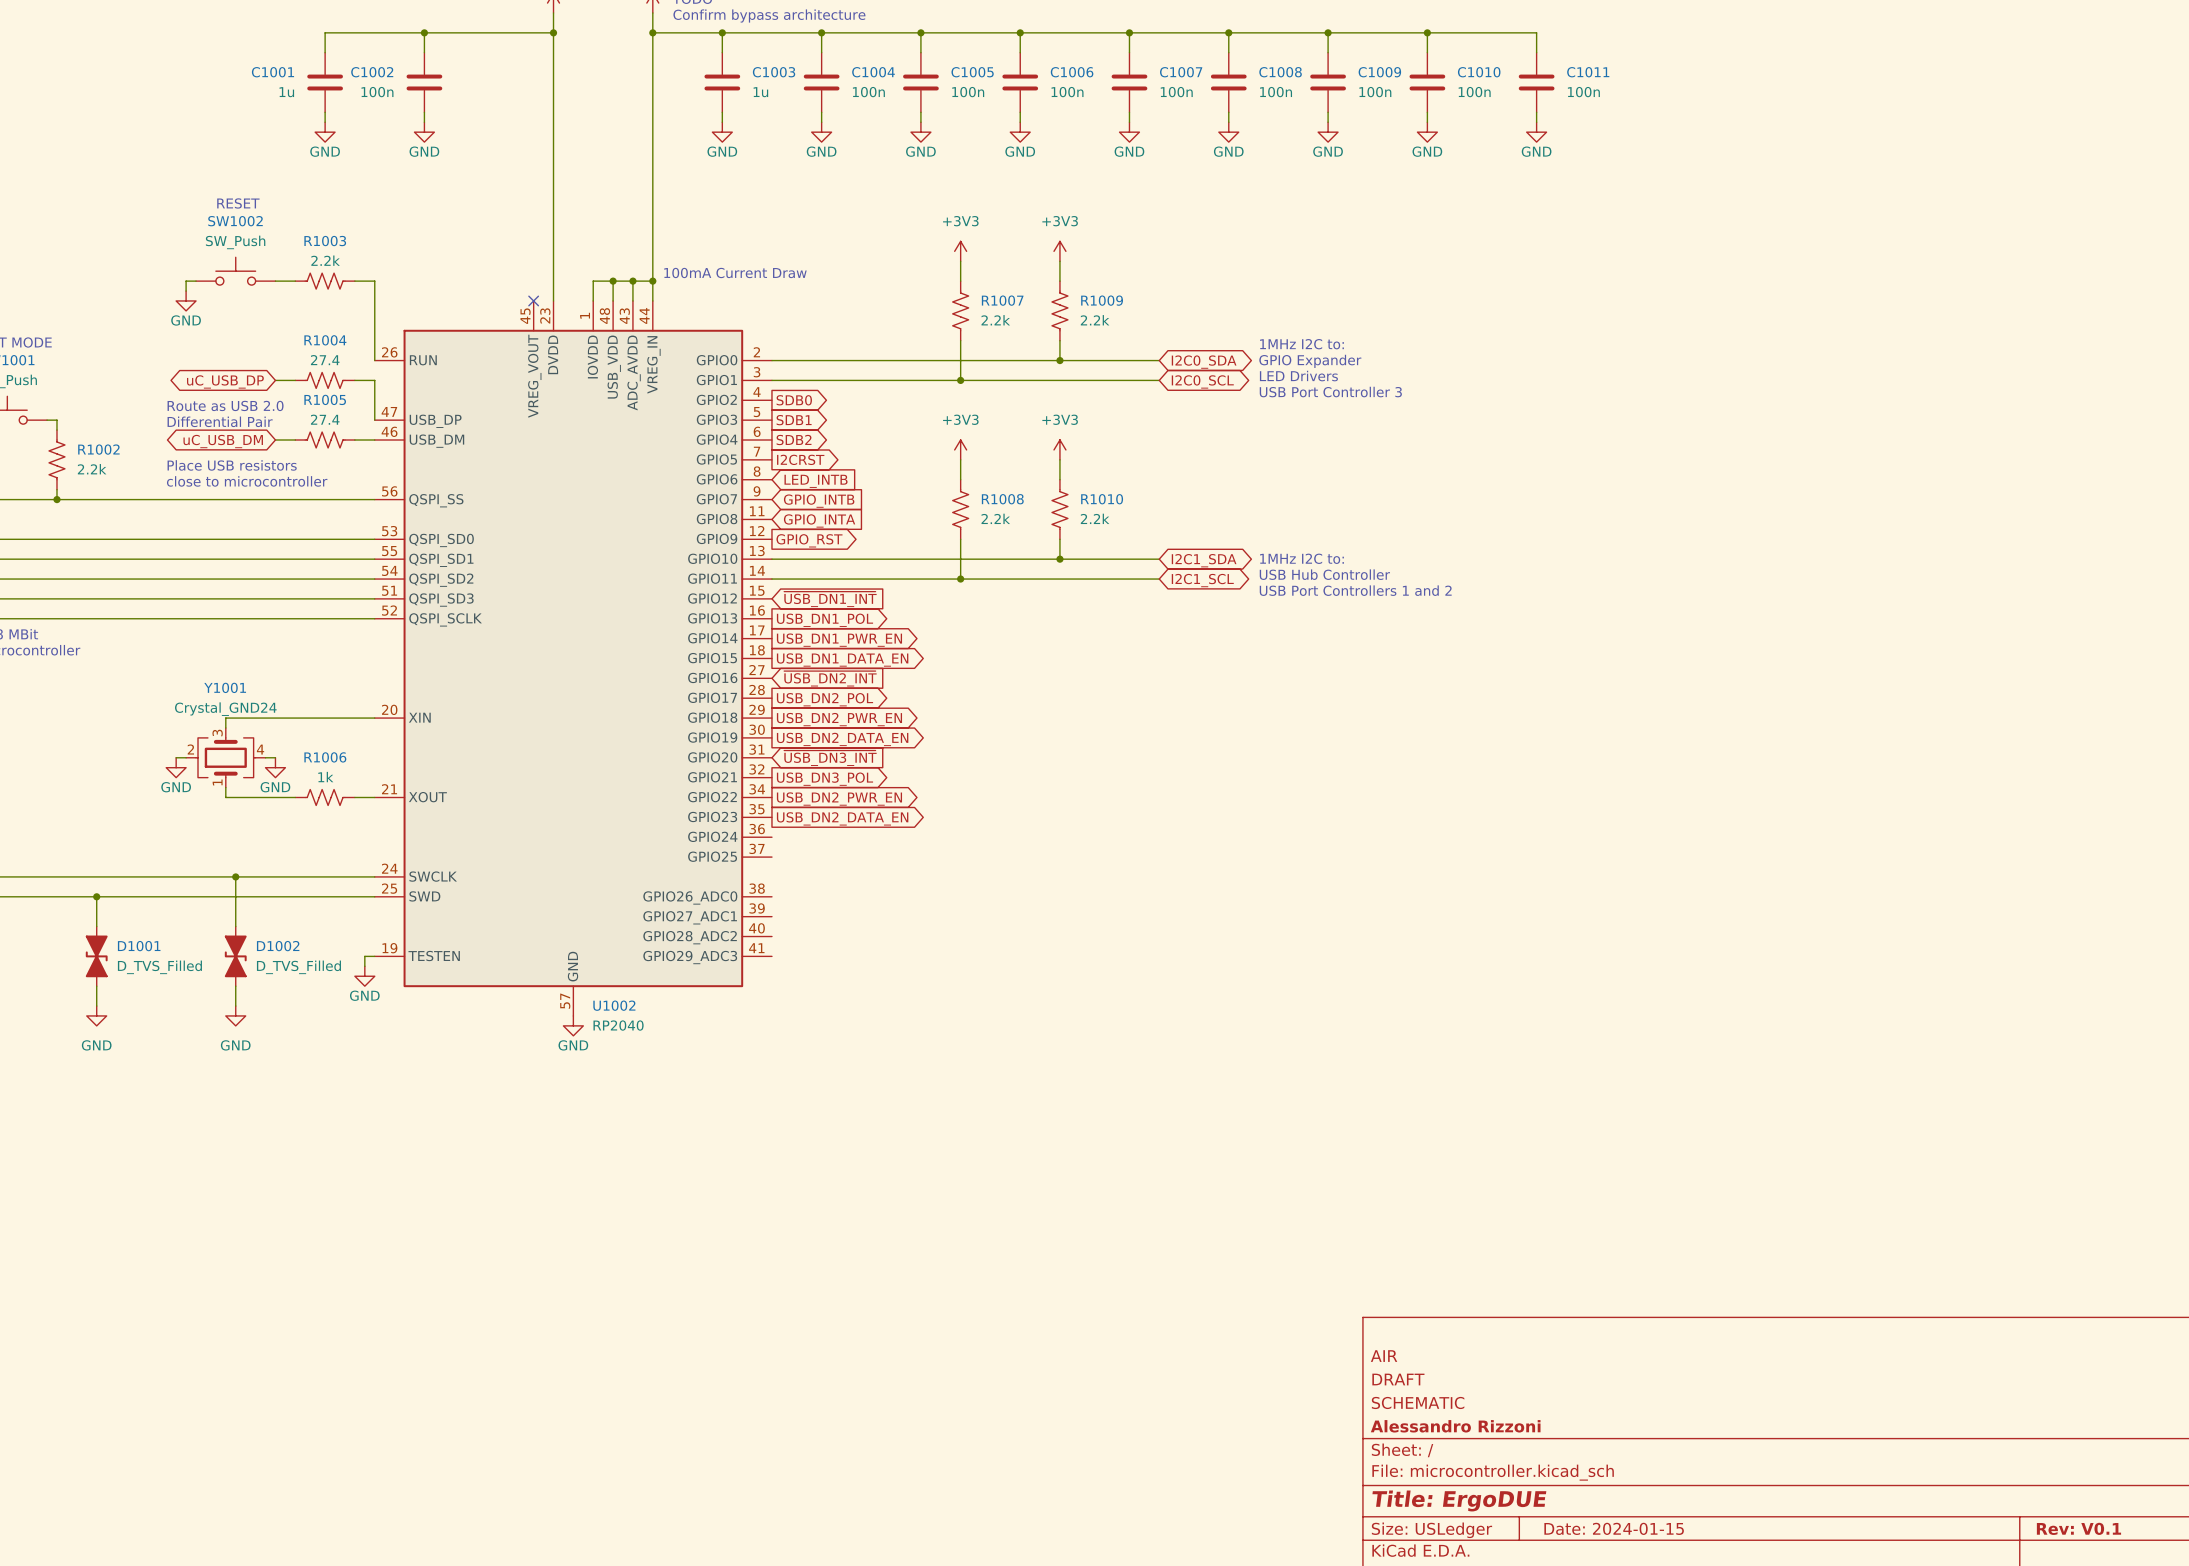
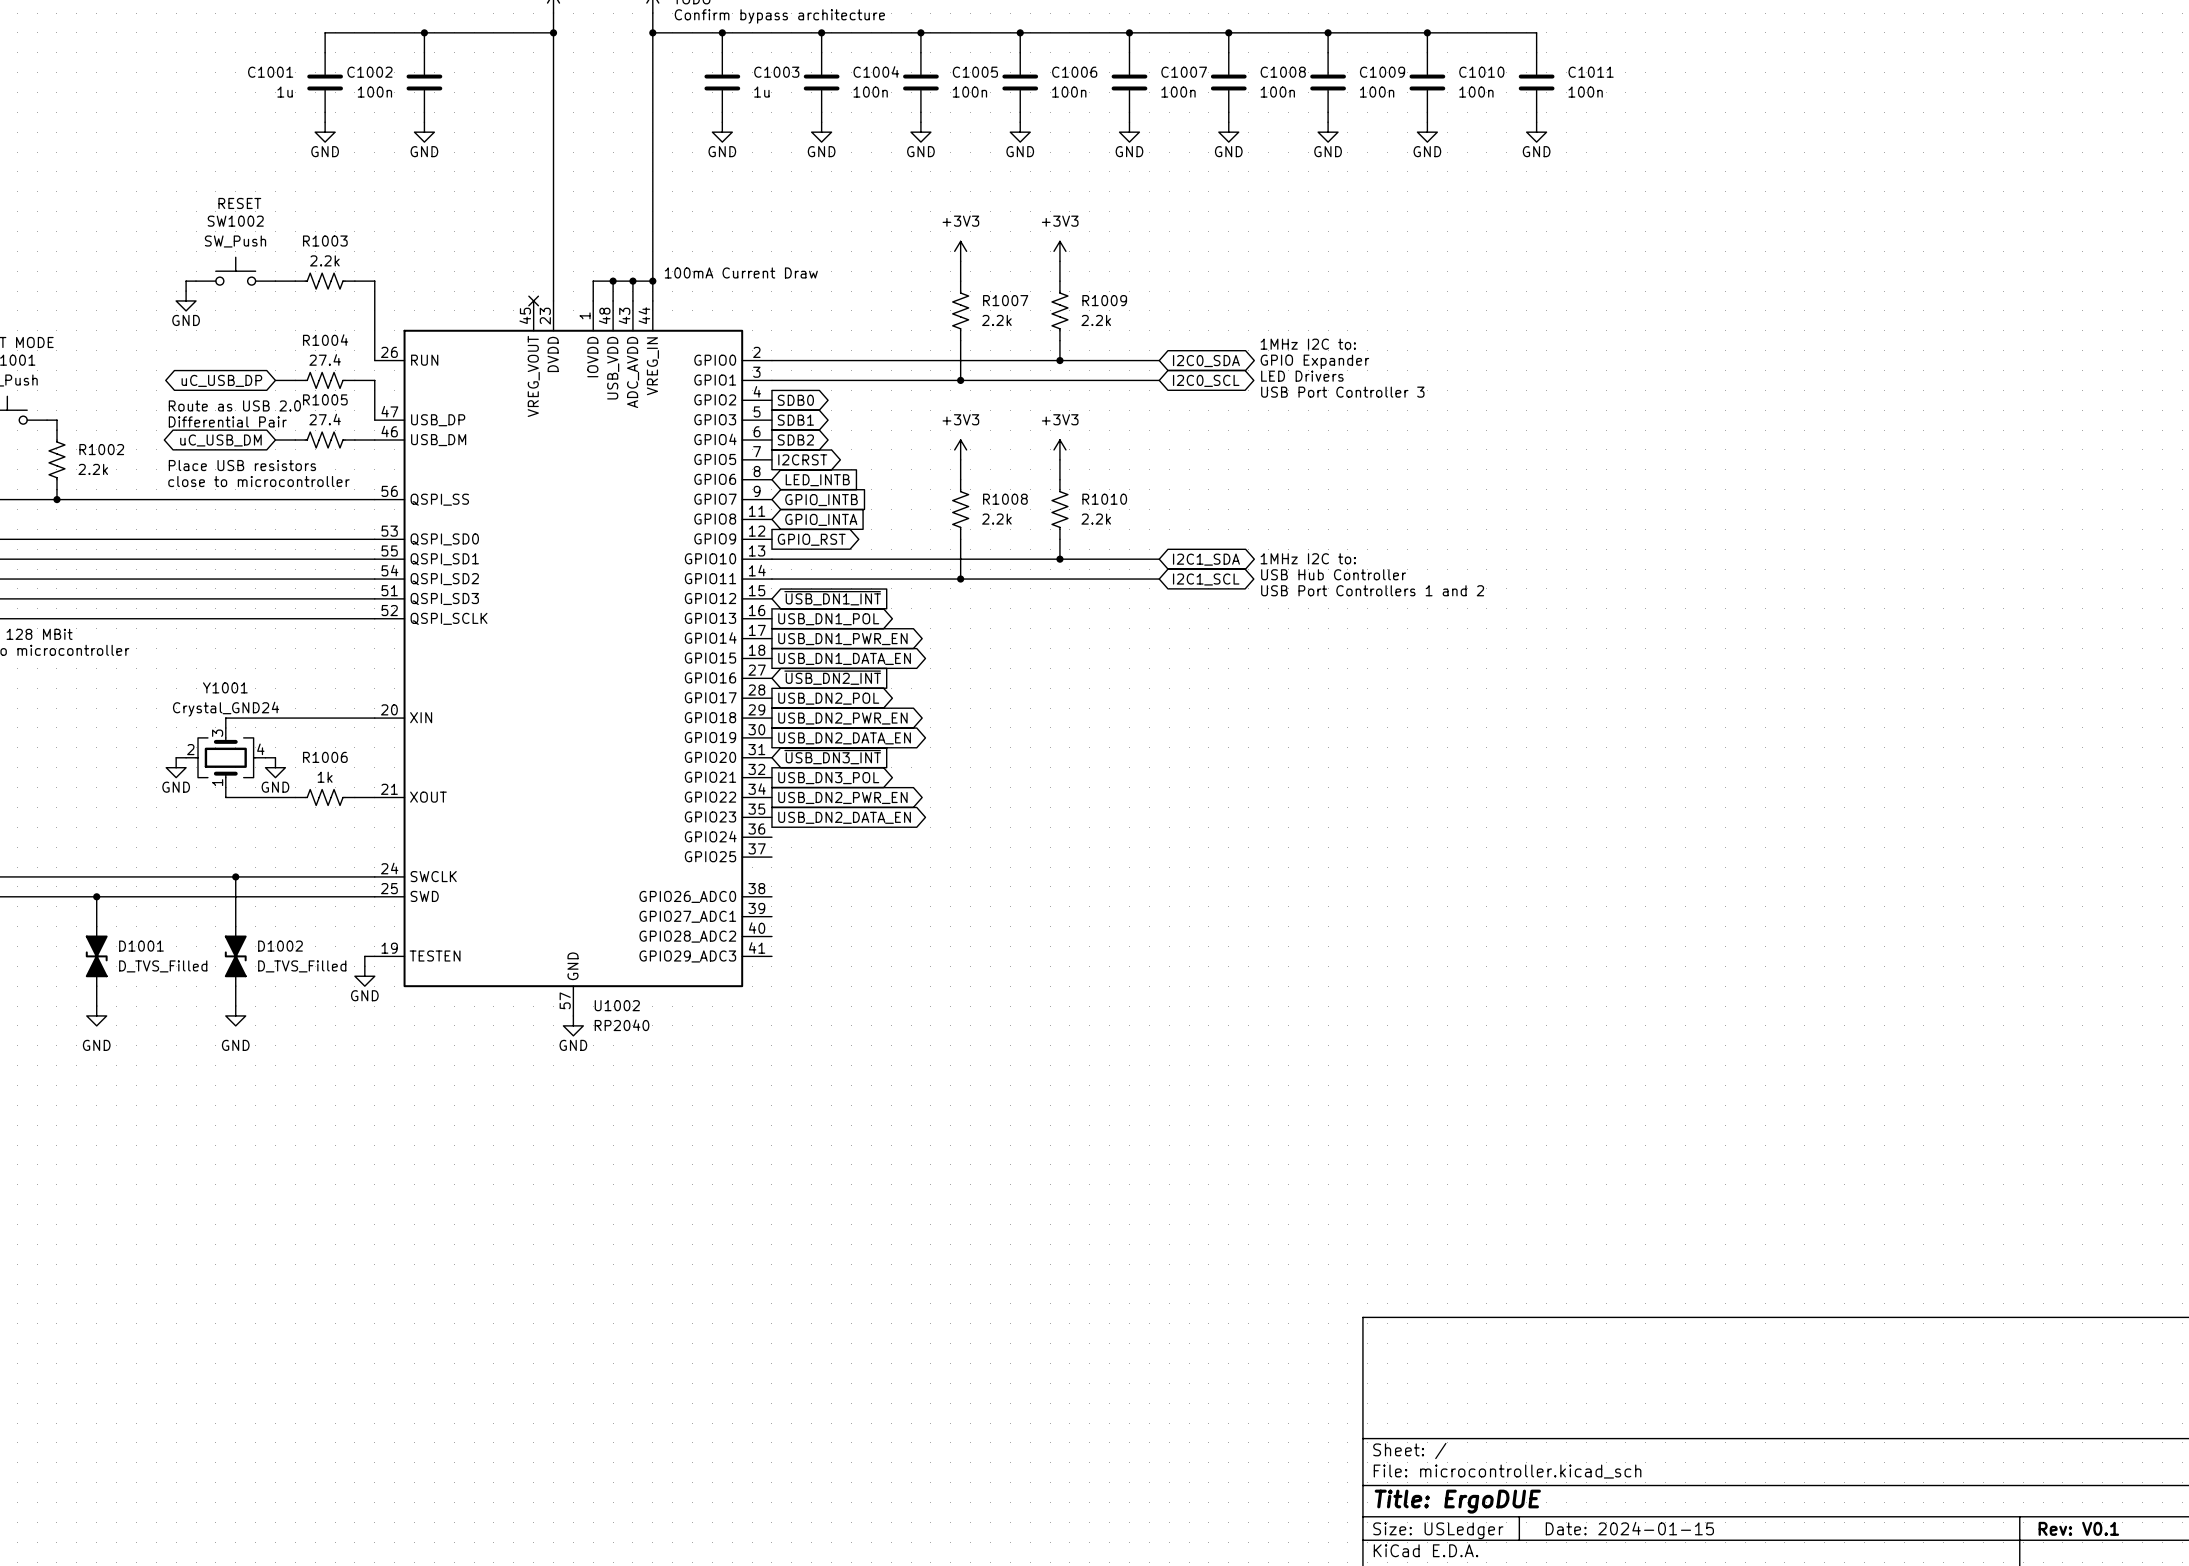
title block: AIR (1384, 1356) -> none
title block: DRAFT (1398, 1379) -> none
title block: SCHEMATIC (1418, 1402) -> none
title block: Alessandro Rizzoni (1455, 1426) -> none

